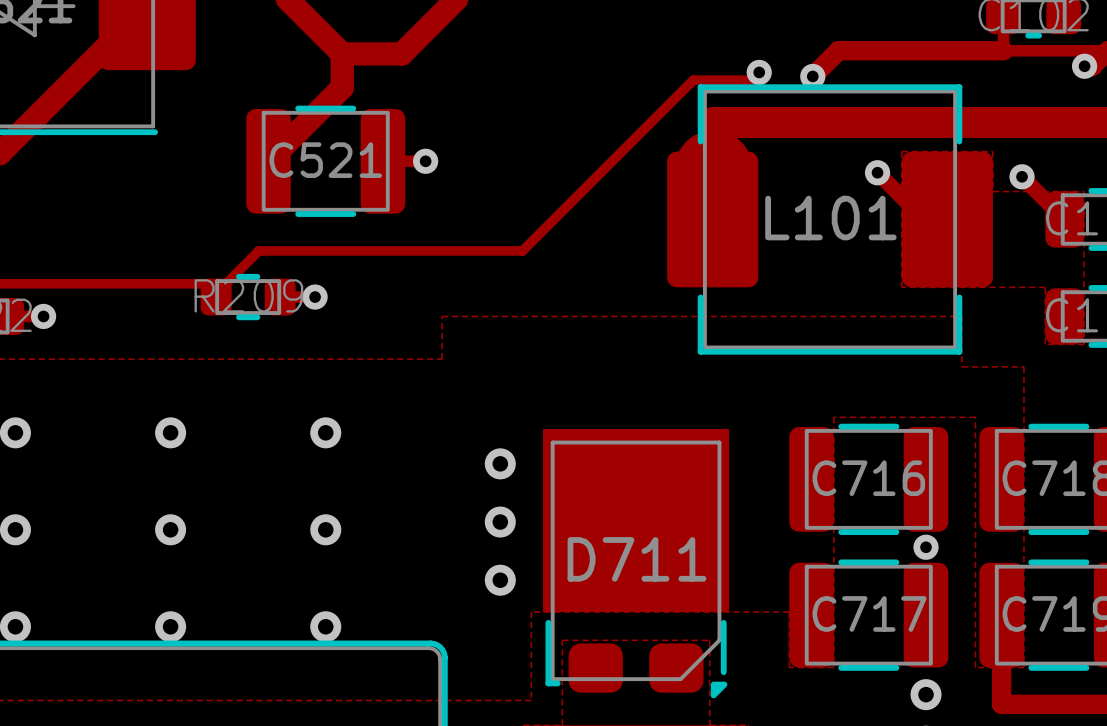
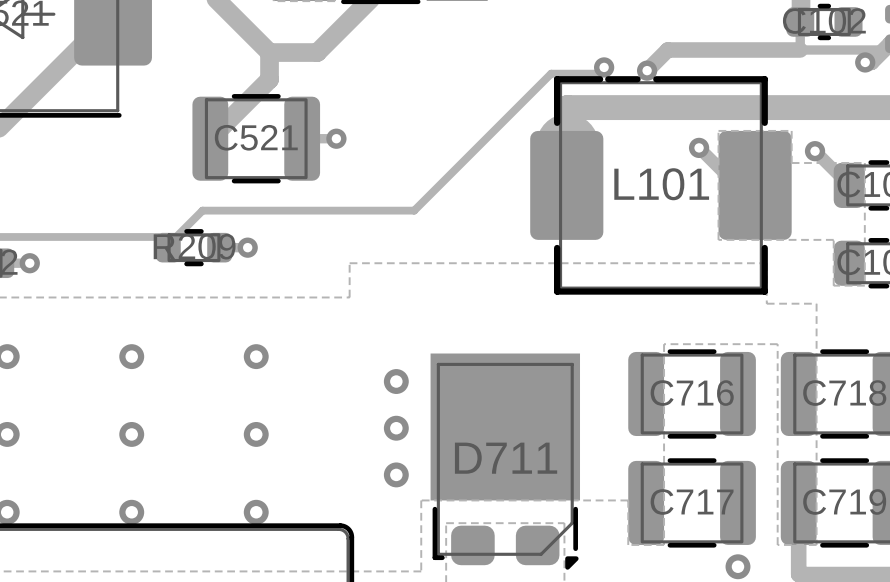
L101 footprint: [667, 84, 993, 355] -> [530, 76, 792, 295]
via: (926, 547) -> none

